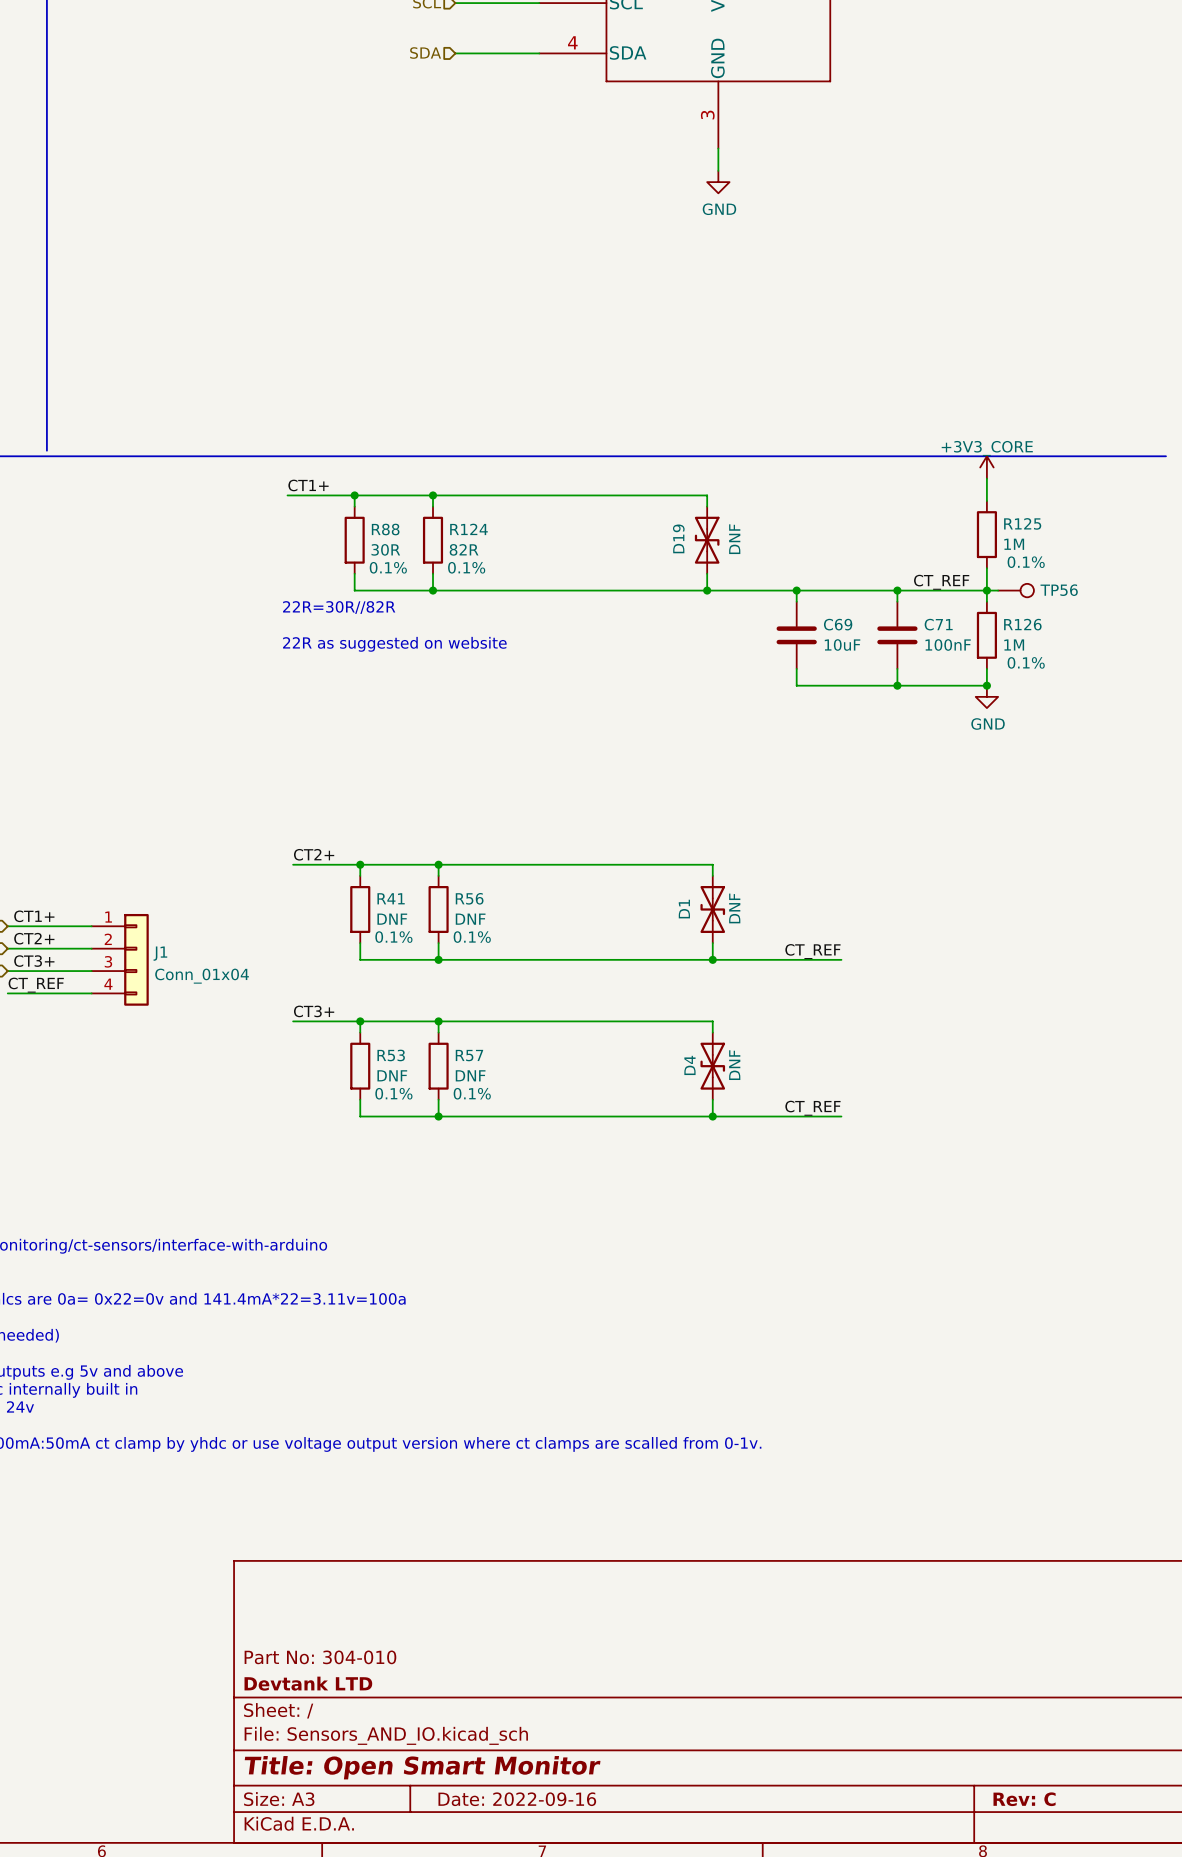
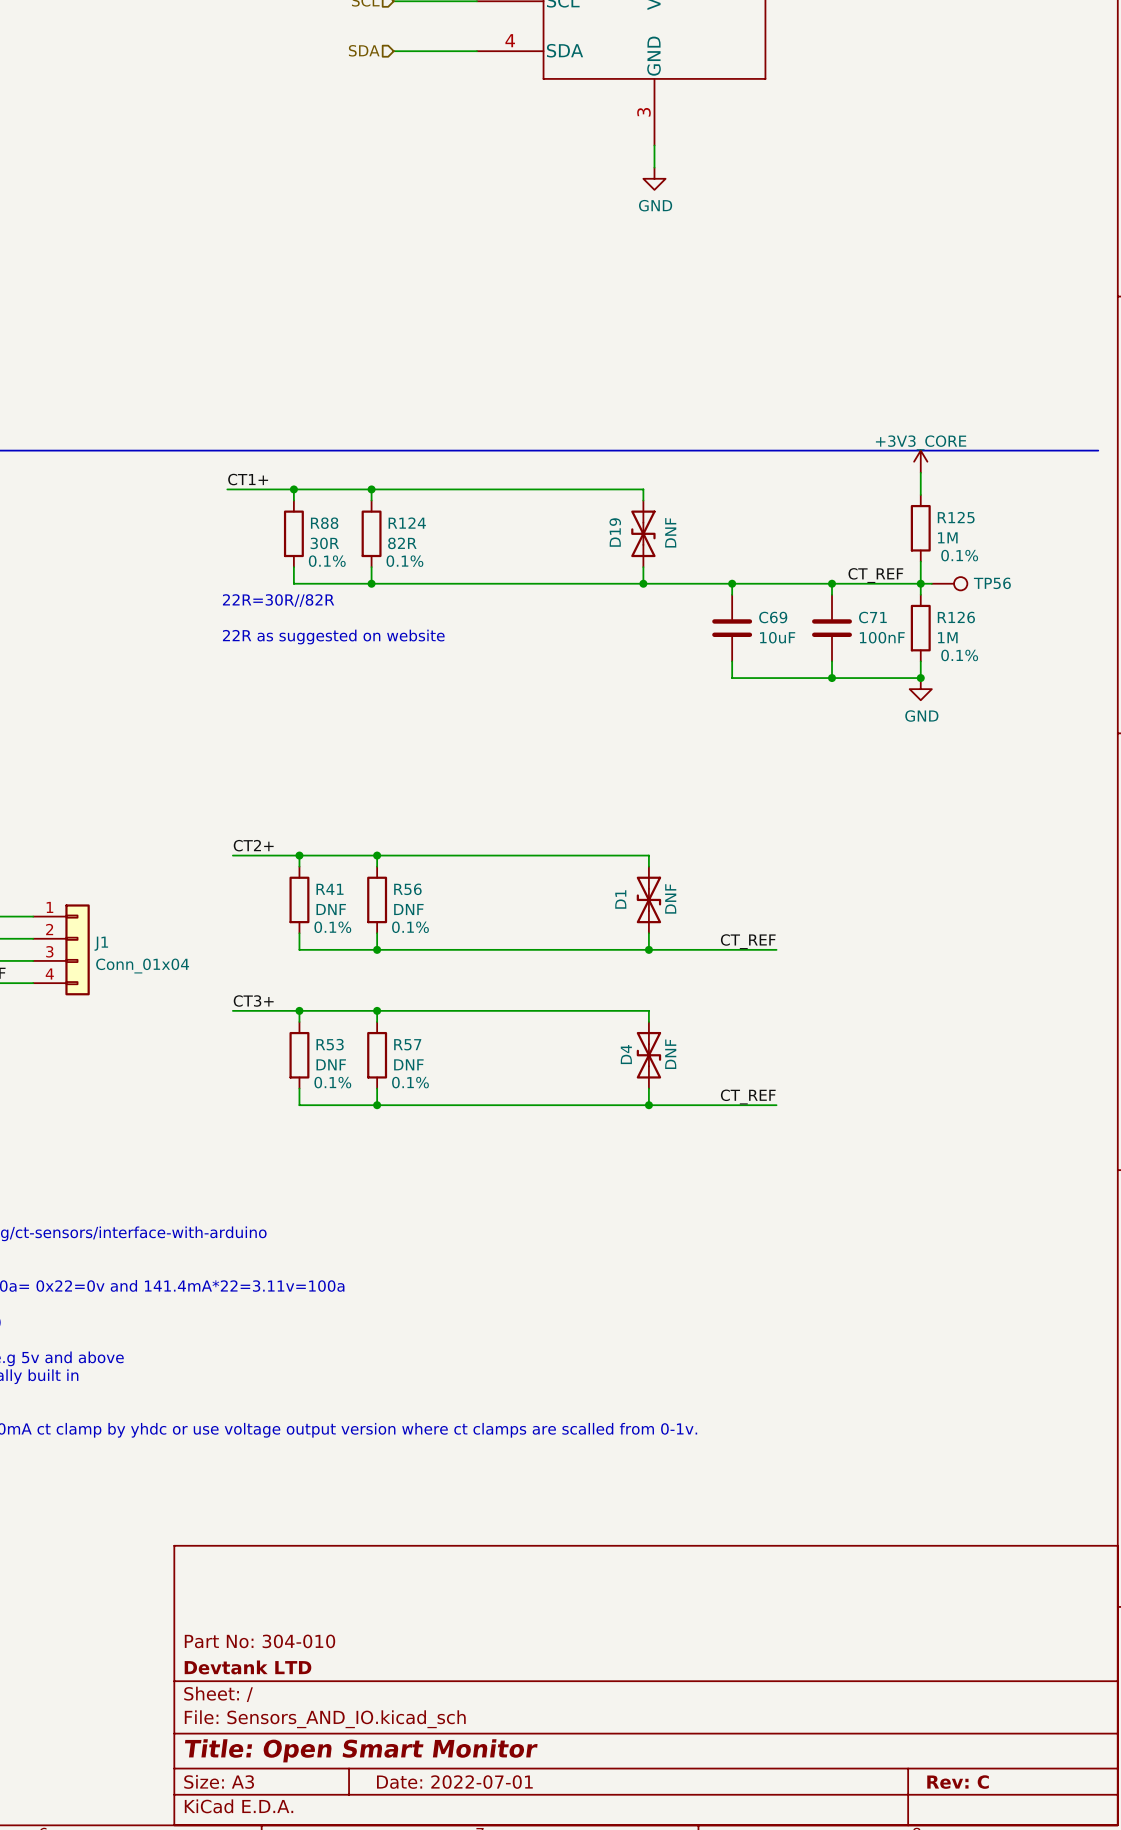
title block: Date: 2022-09-16 (517, 1799) -> Date: 2022-07-01 (454, 1782)

